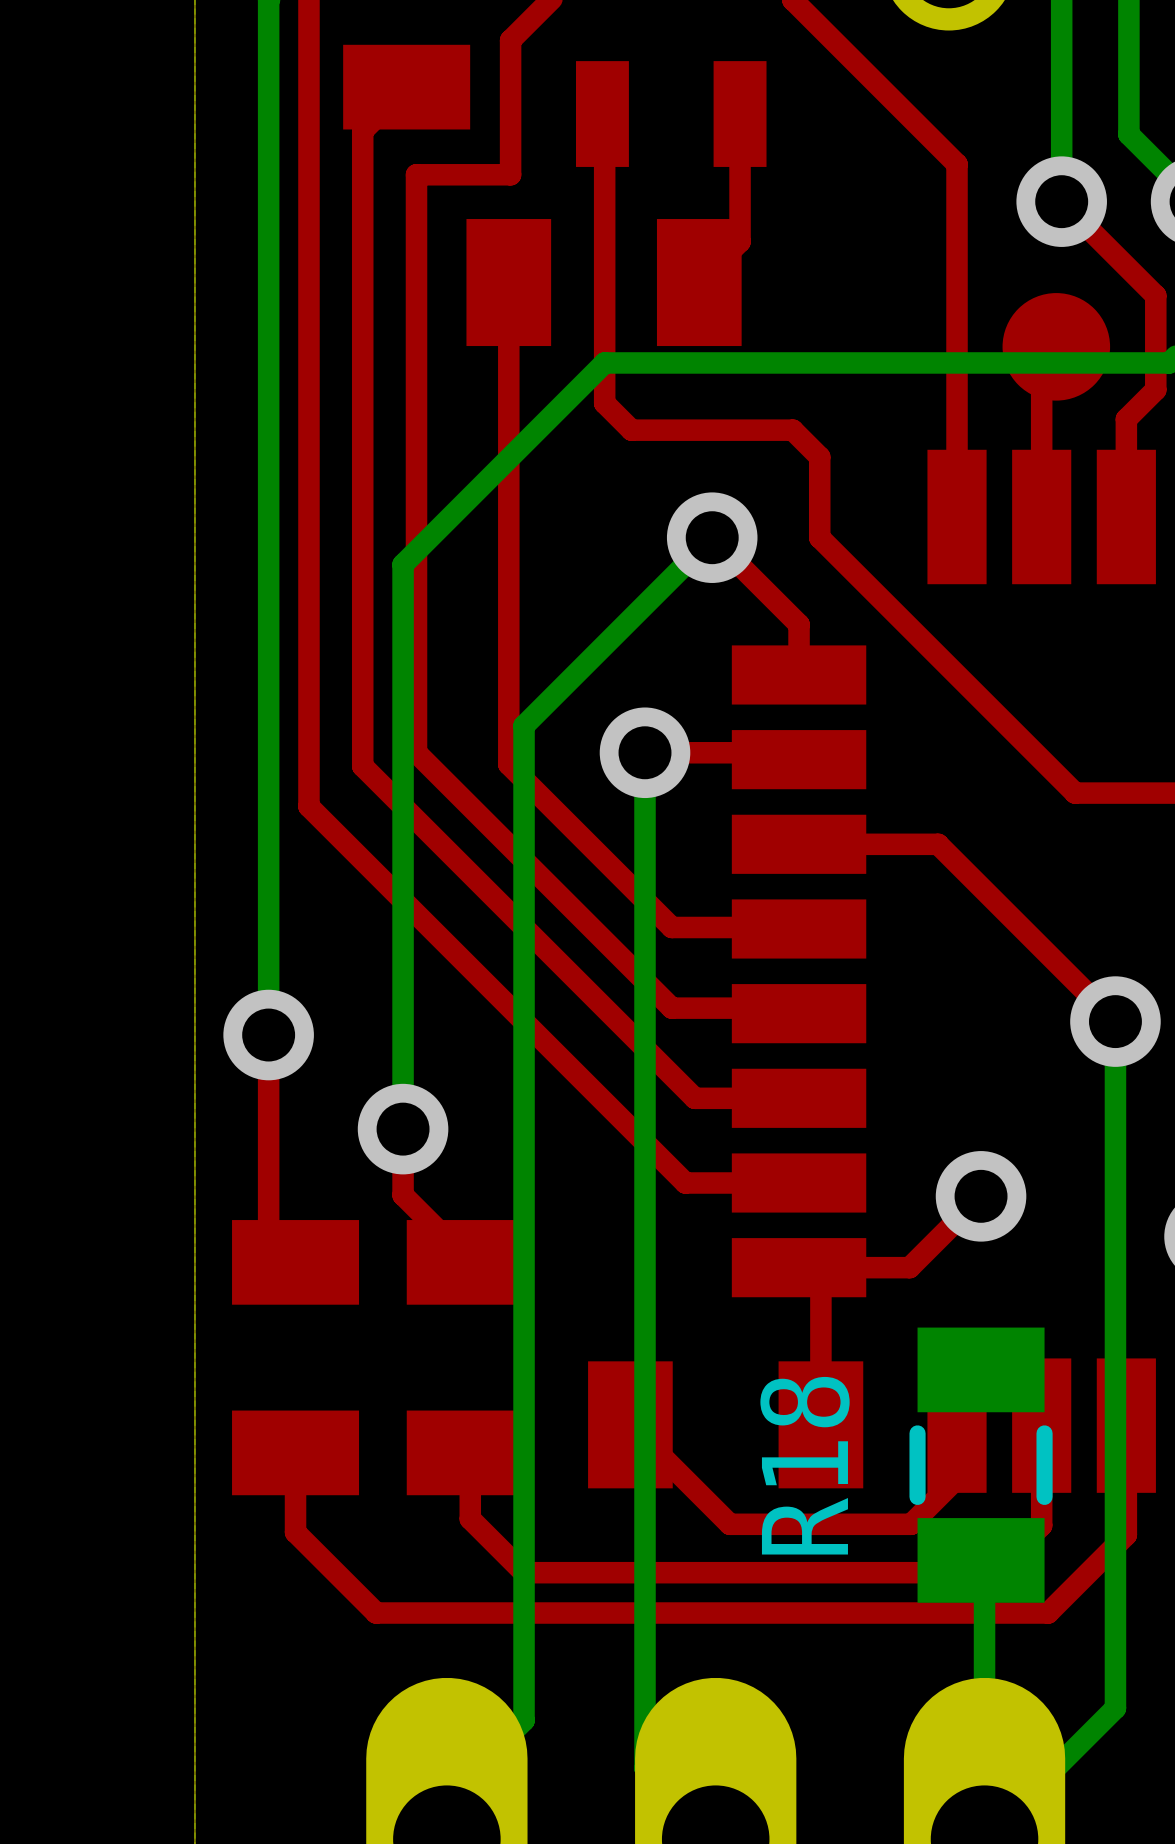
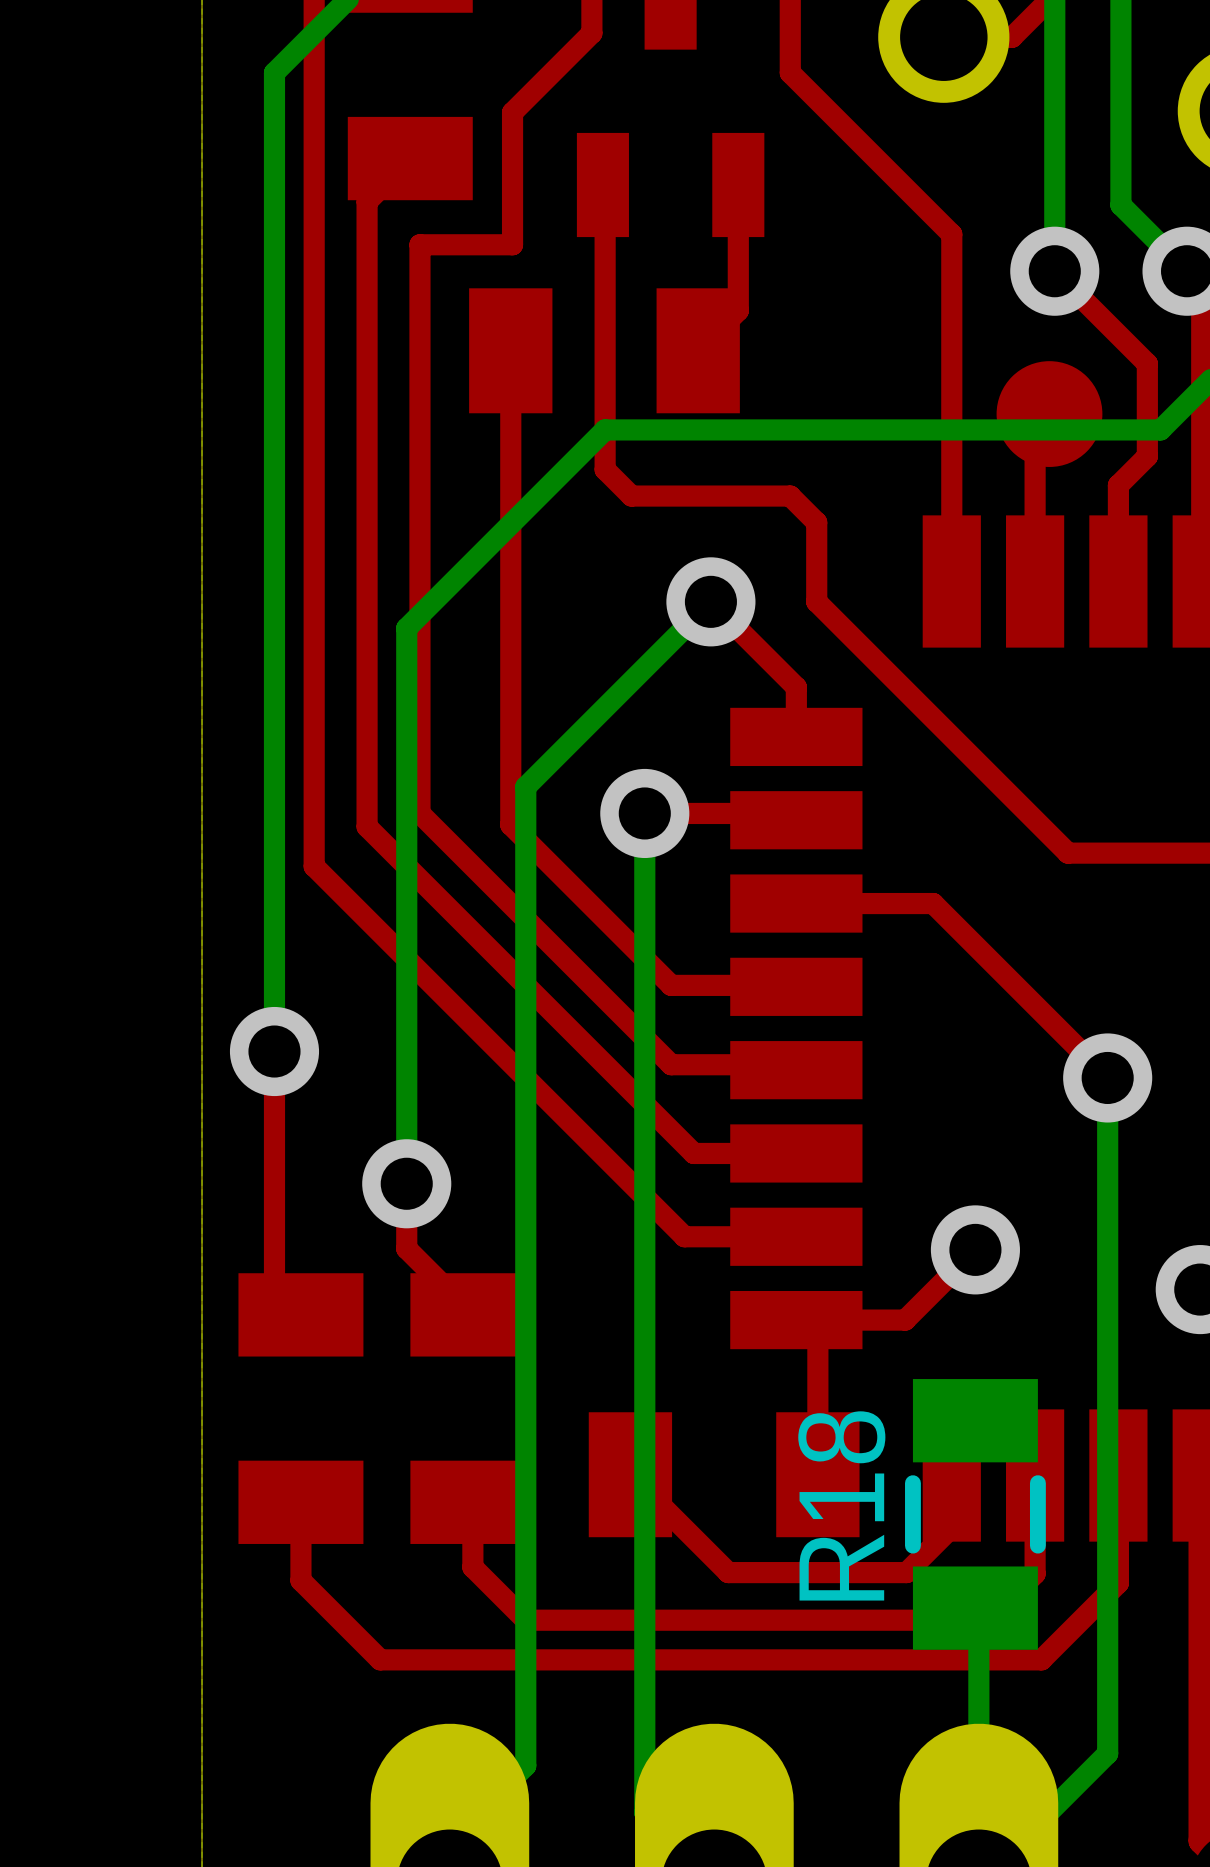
via position: (268, 1035) -> (274, 1051)
R18 name position: R18 (805, 1465) -> R18 (841, 1505)

